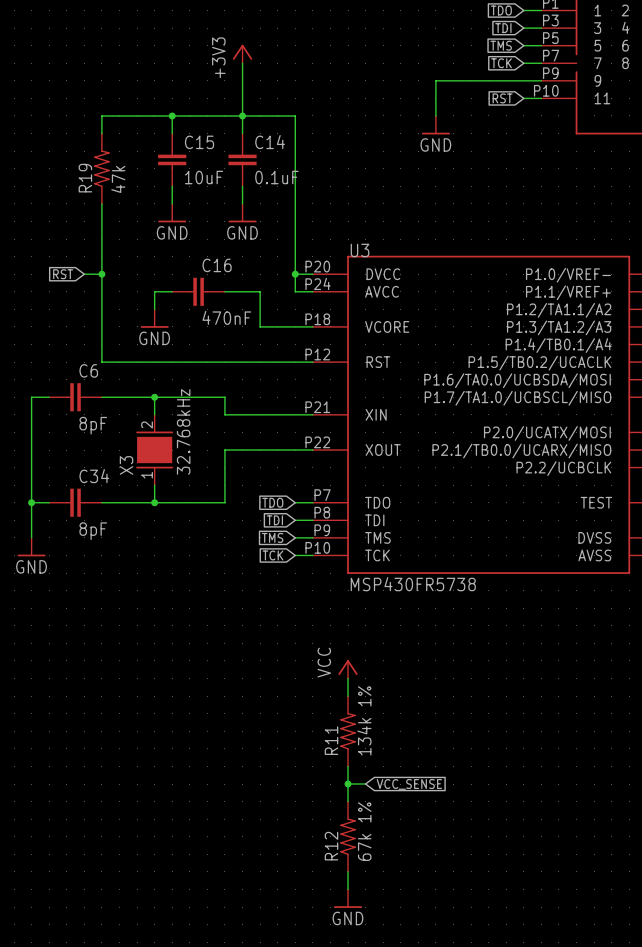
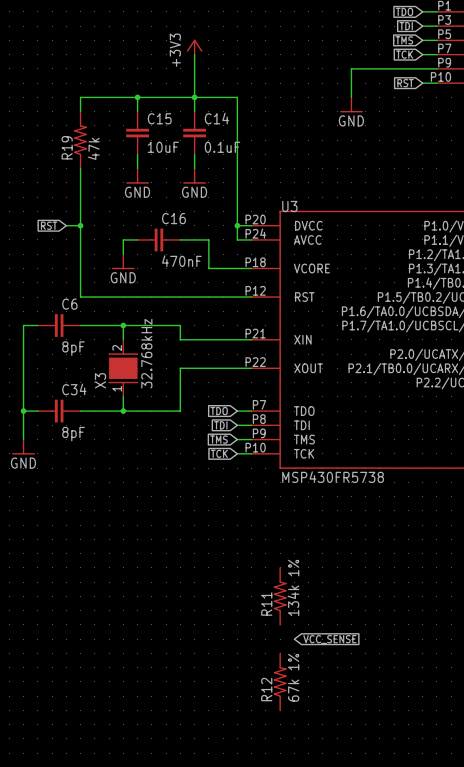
power symbol: VCC (348, 669) -> none
wire: (348, 678) (348, 696) -> none
wire: (348, 766) (348, 801) -> none
wire: (348, 784) (365, 784) -> none
junction: (348, 784) -> none
wire: (348, 871) (348, 889) -> none
power symbol: GND (348, 898) -> none

